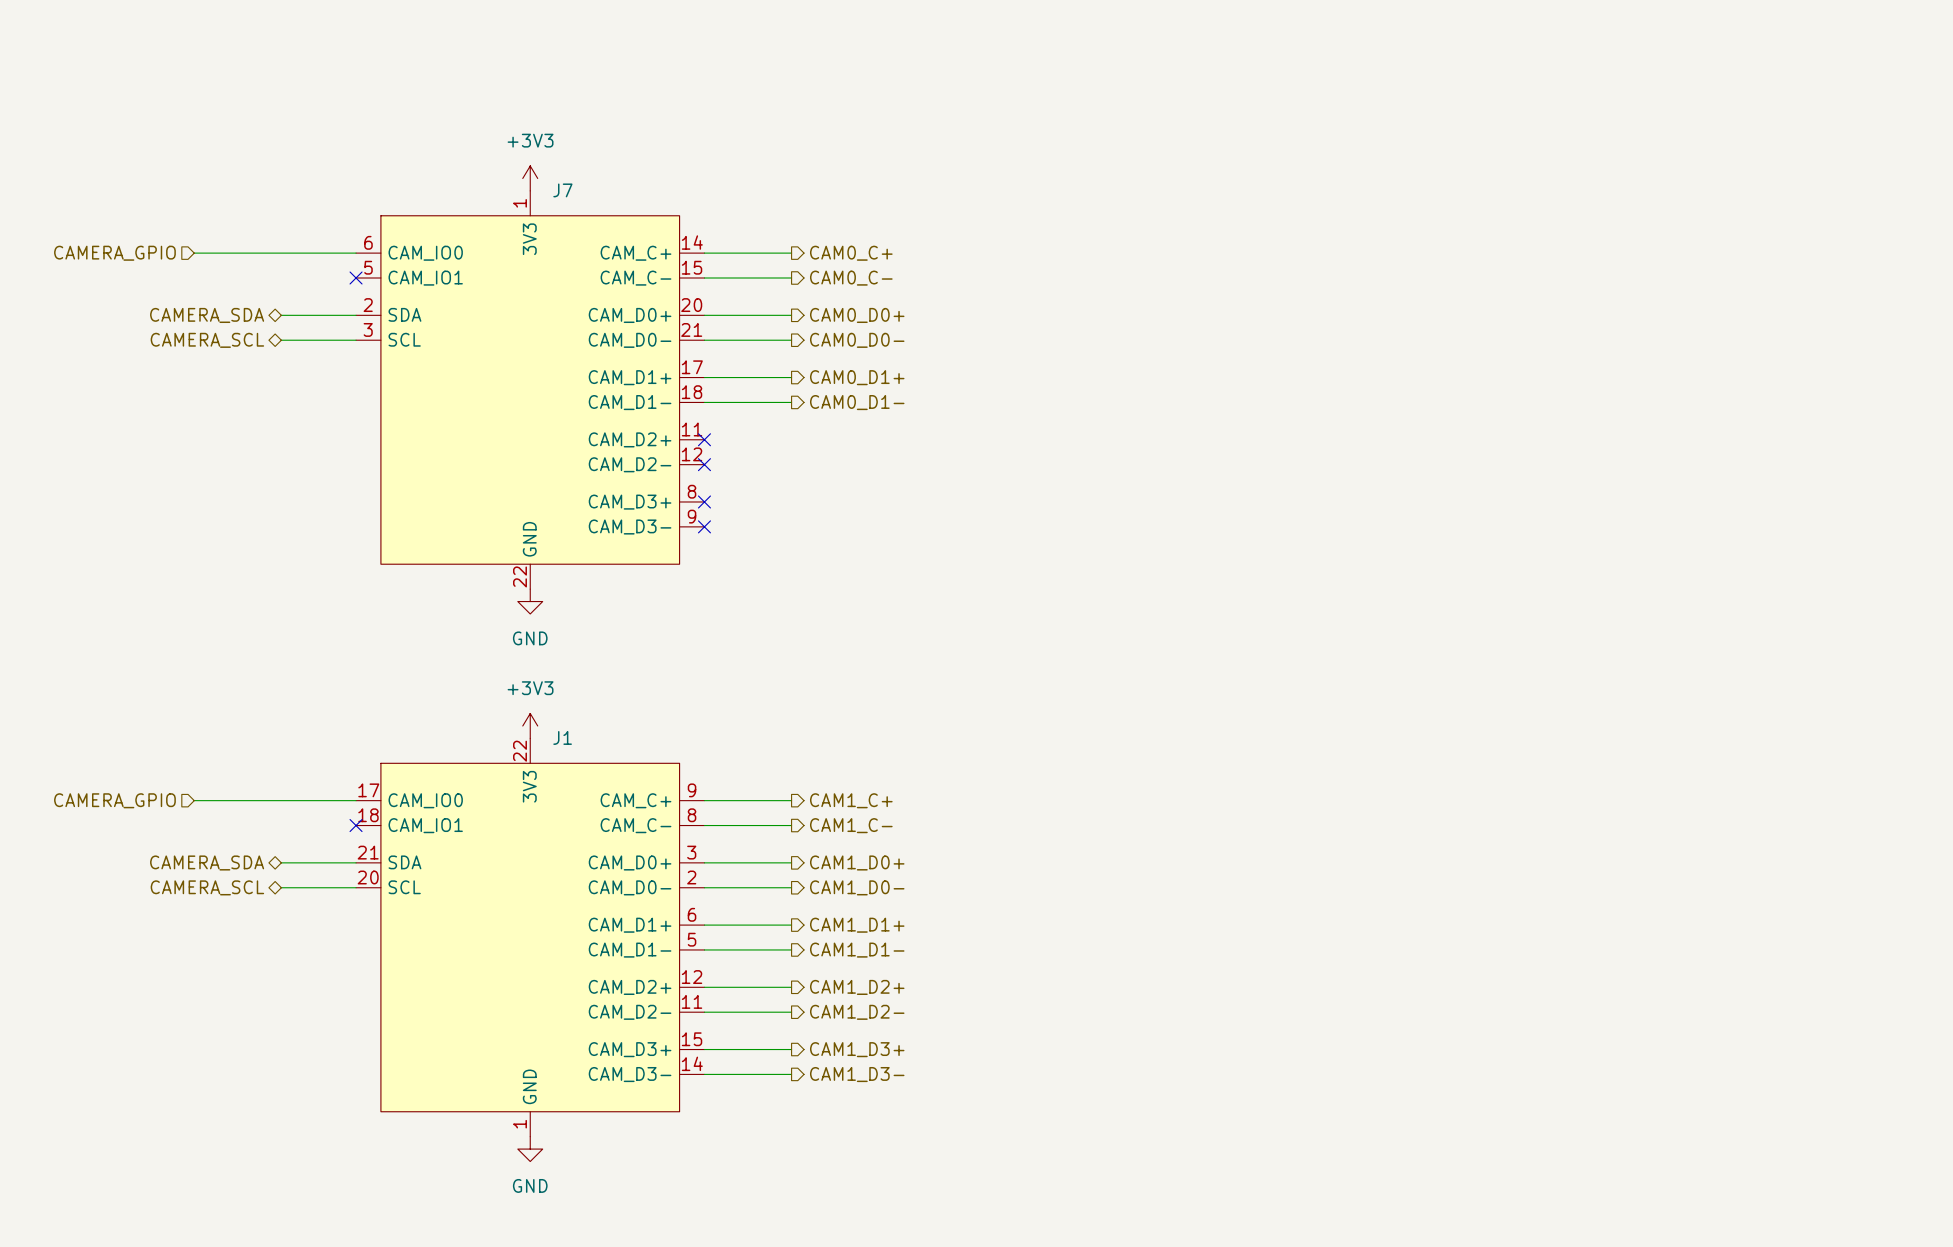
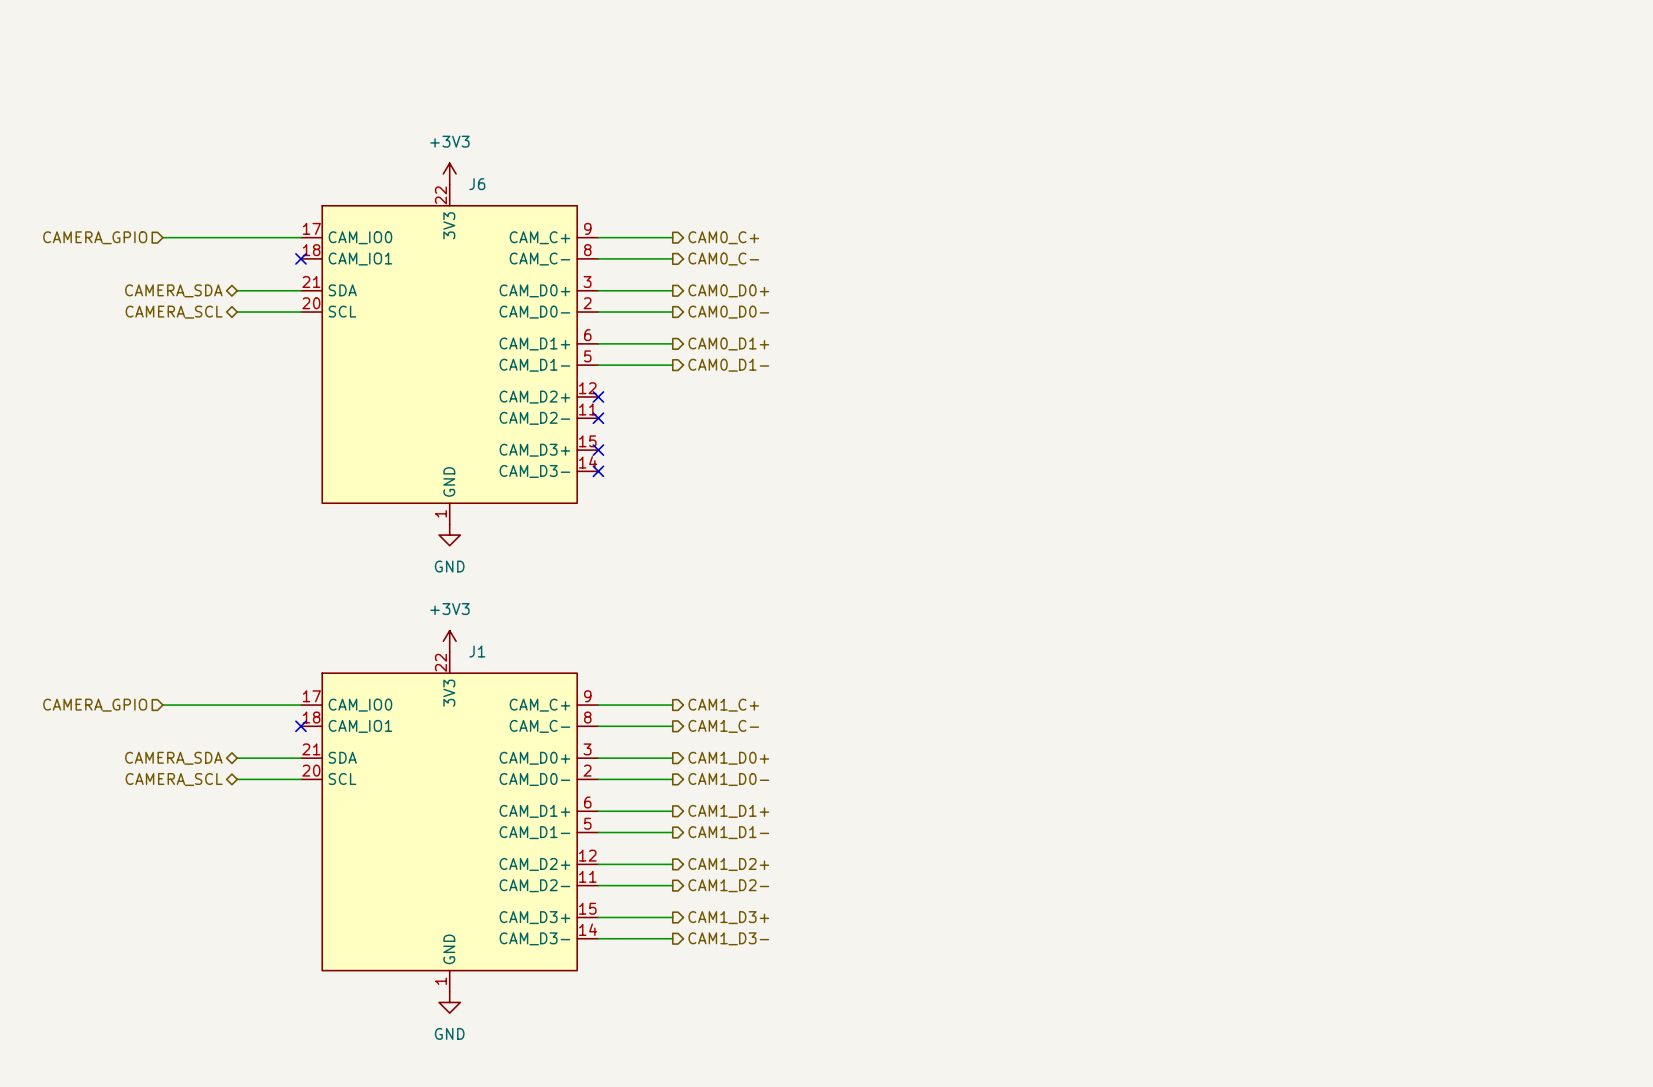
J7 symbol: [356, 190, 705, 590] -> [300, 184, 599, 525]
J7 name: J7 (562, 190) -> J6 (477, 184)

